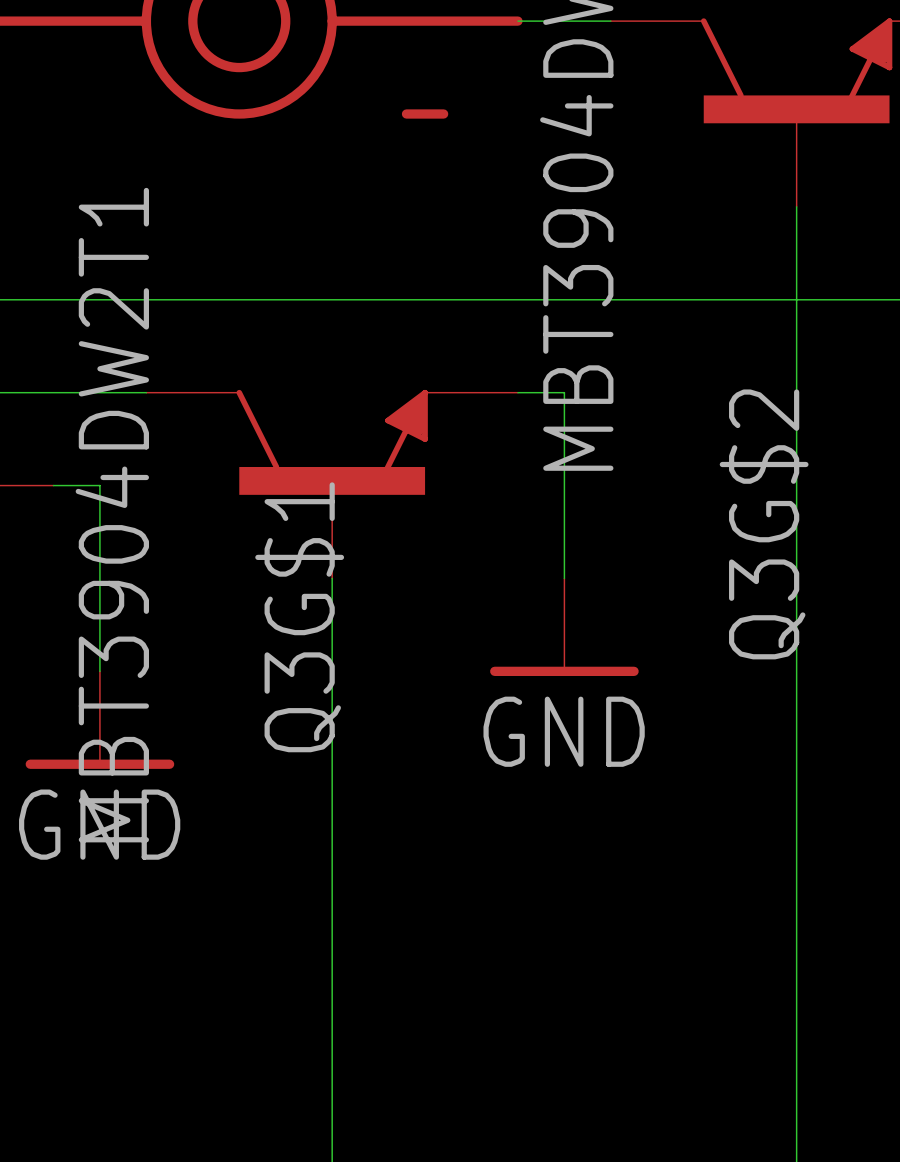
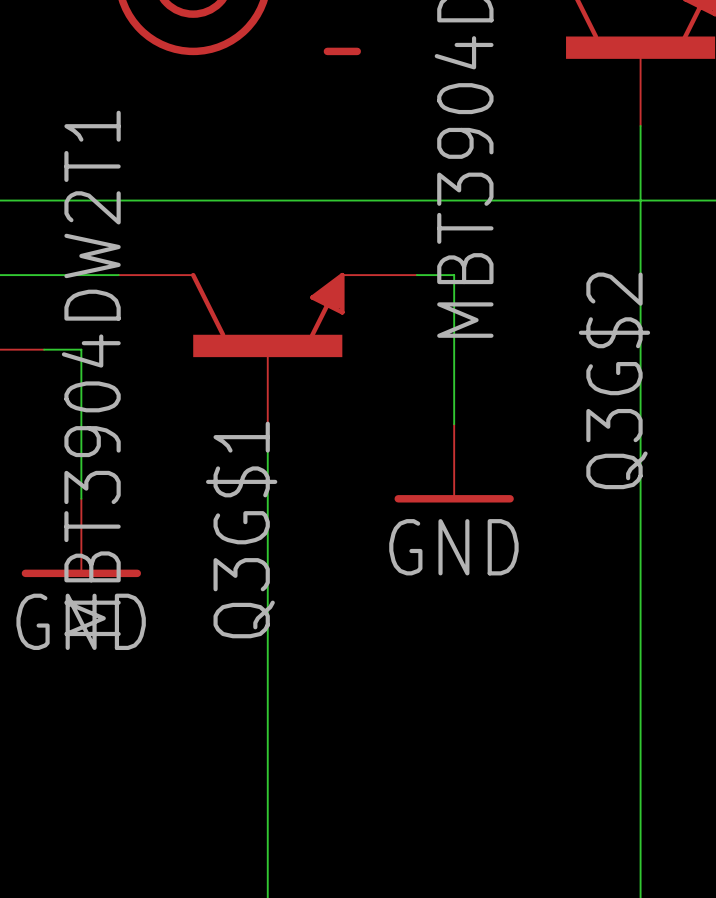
Q3G$1 name position: Q3G$1 (299, 617) -> Q3G$1 (241, 529)

